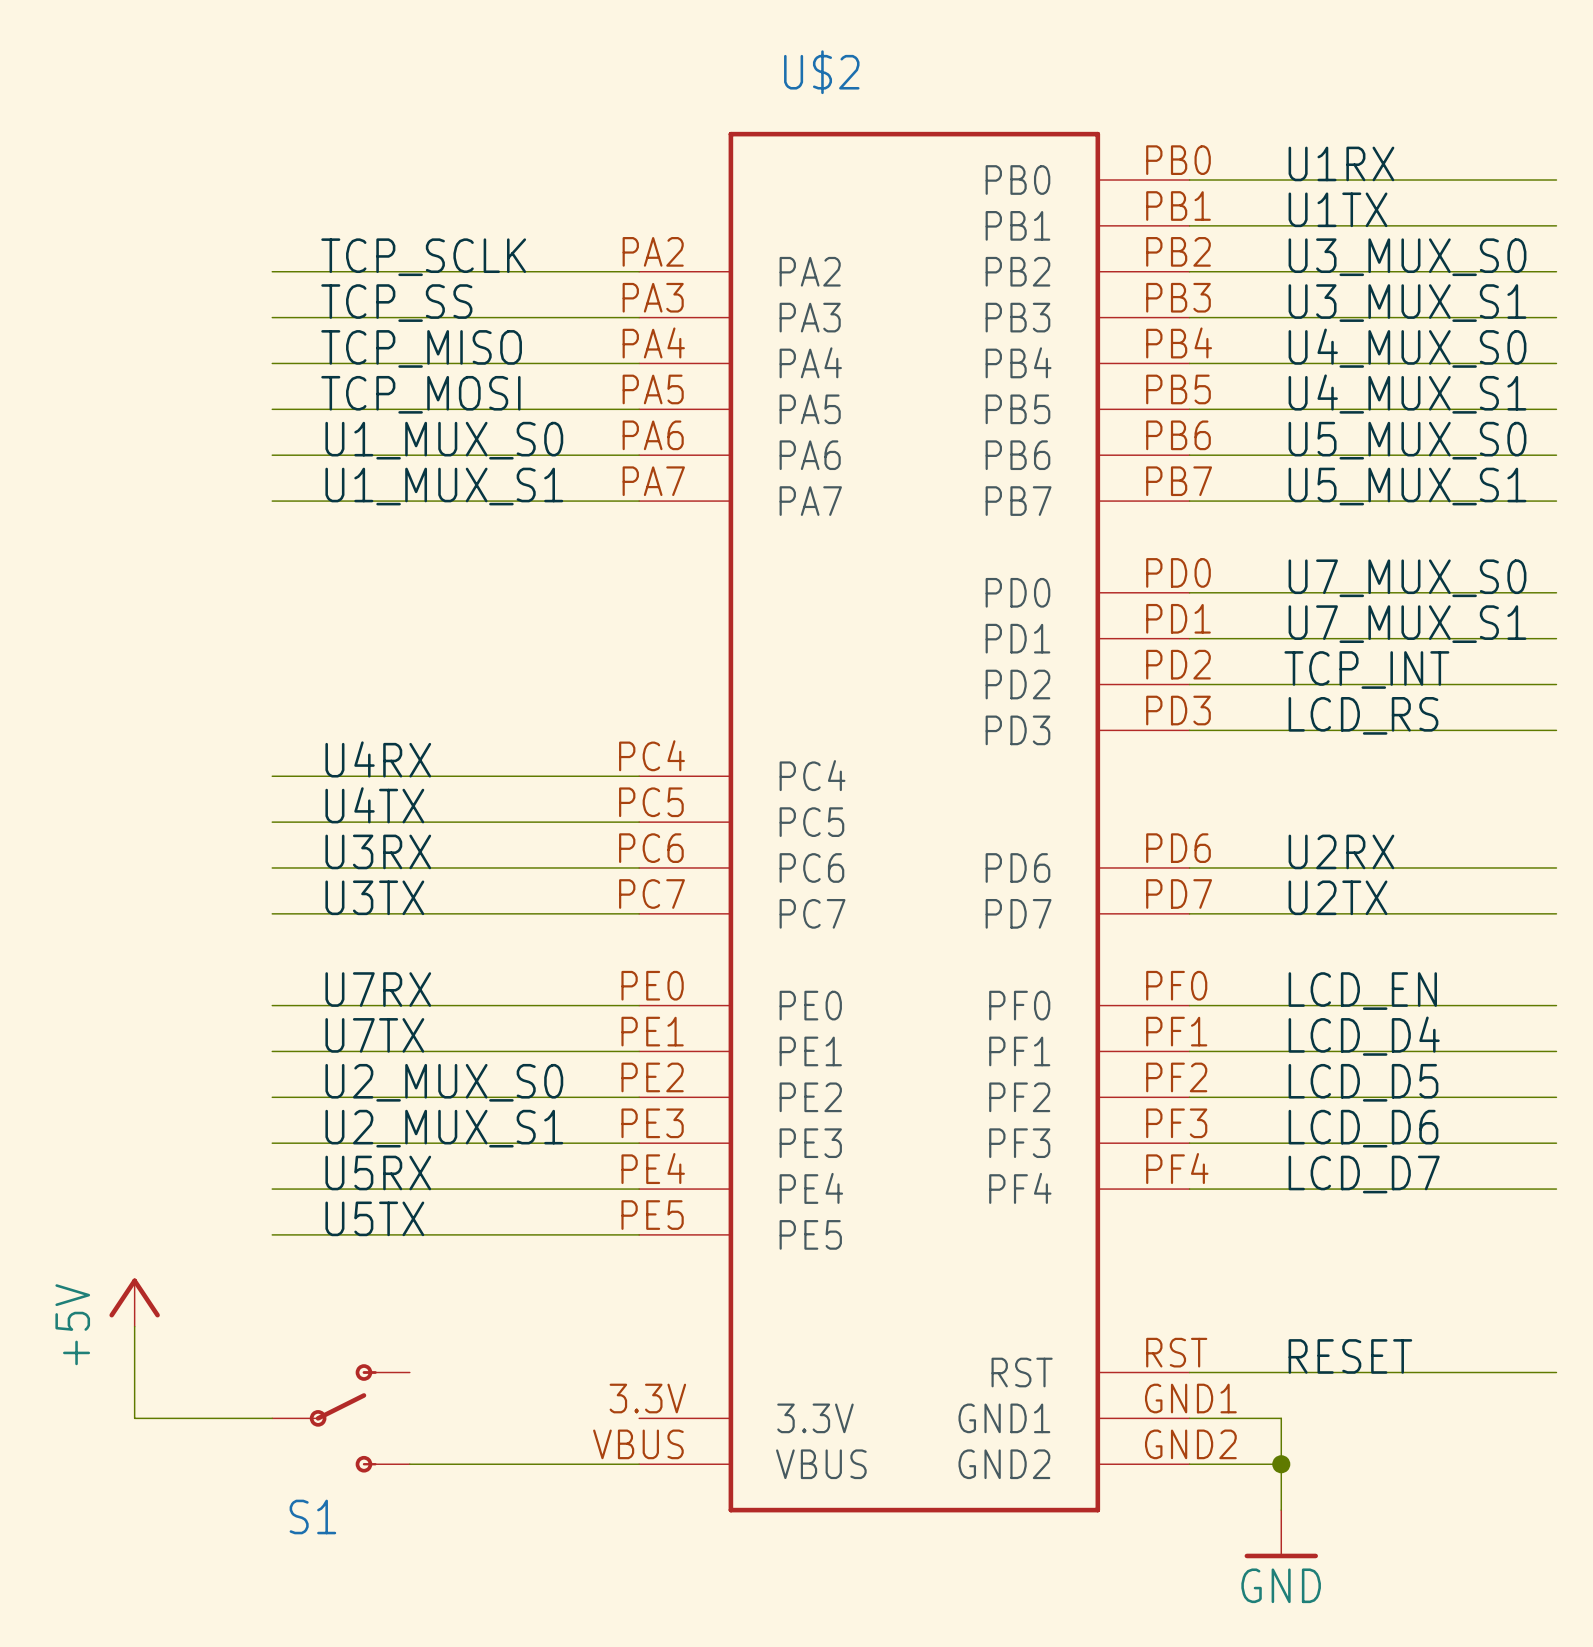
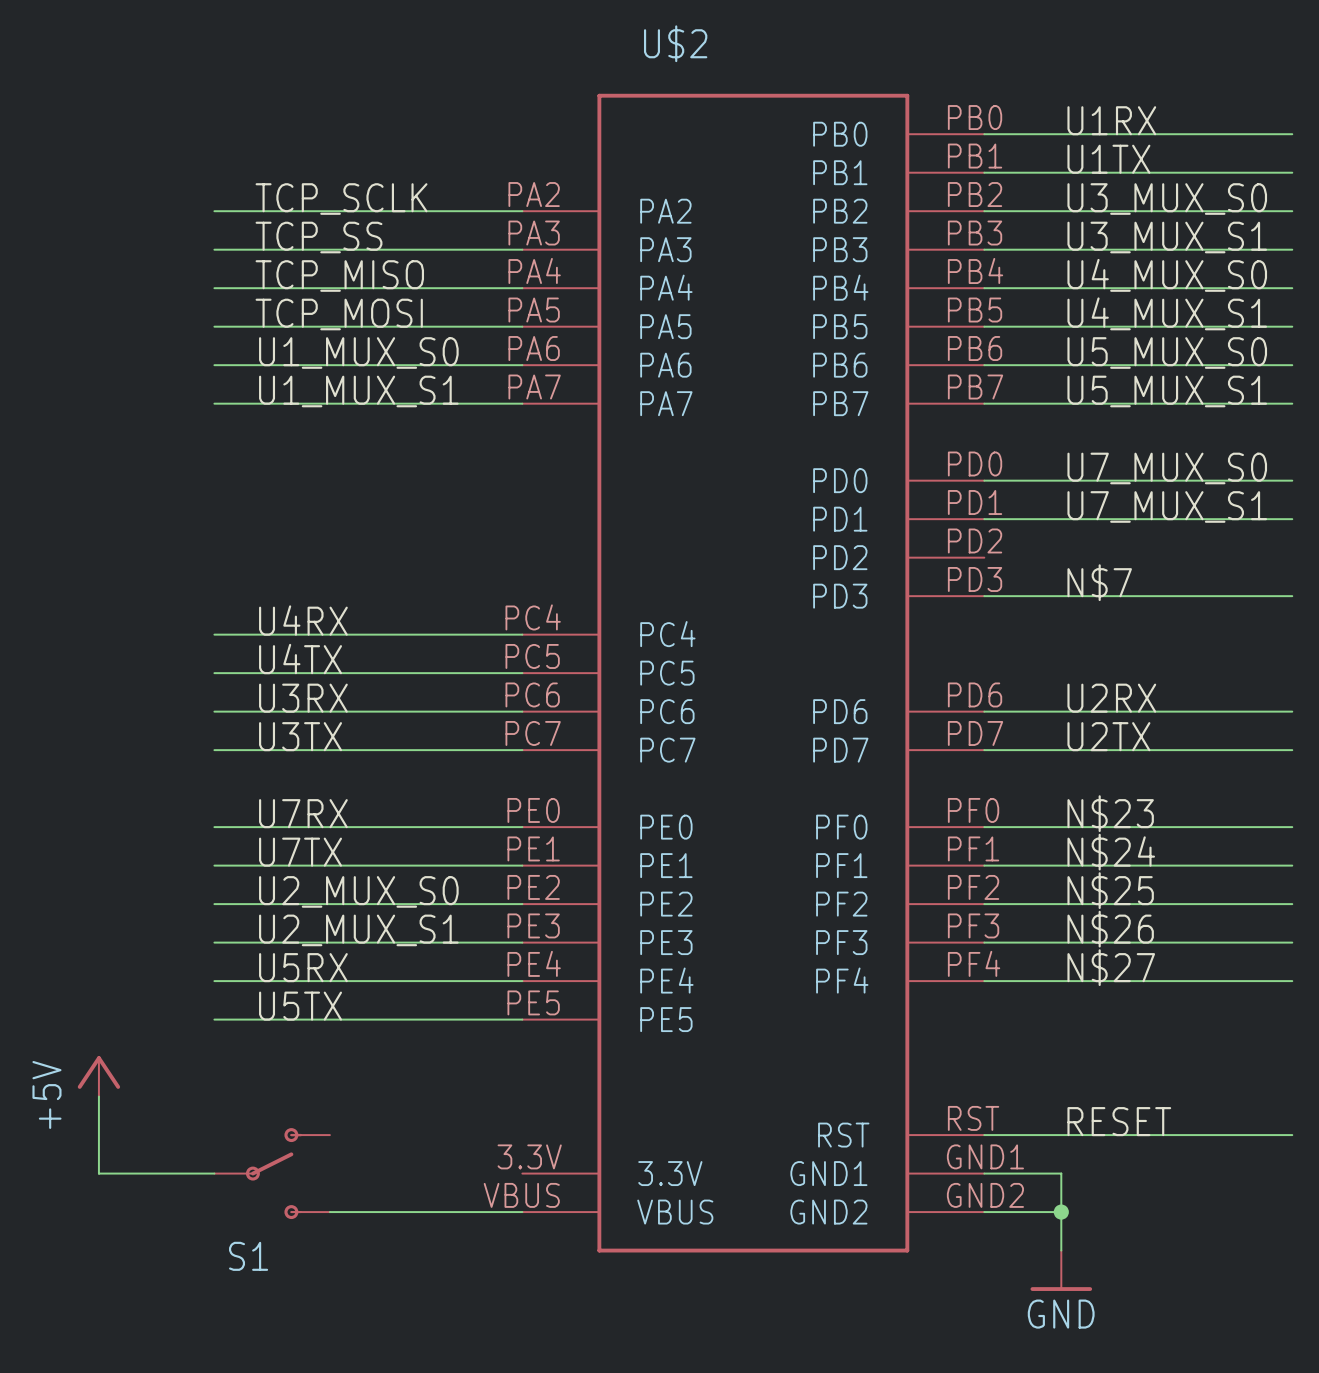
label: TCP_INT (1366, 670) -> none
wire: (1189, 684) (1556, 684) -> none
label: LCD_RS (1363, 715) -> N$7 (1099, 582)
label: LCD_EN (1362, 991) -> N$23 (1110, 813)
label: LCD_D4 (1364, 1036) -> N$24 (1111, 852)
label: LCD_D5 (1363, 1082) -> N$25 (1110, 890)
label: LCD_D6 (1363, 1128) -> N$26 (1110, 929)
label: LCD_D7 (1364, 1174) -> N$27 (1111, 967)

